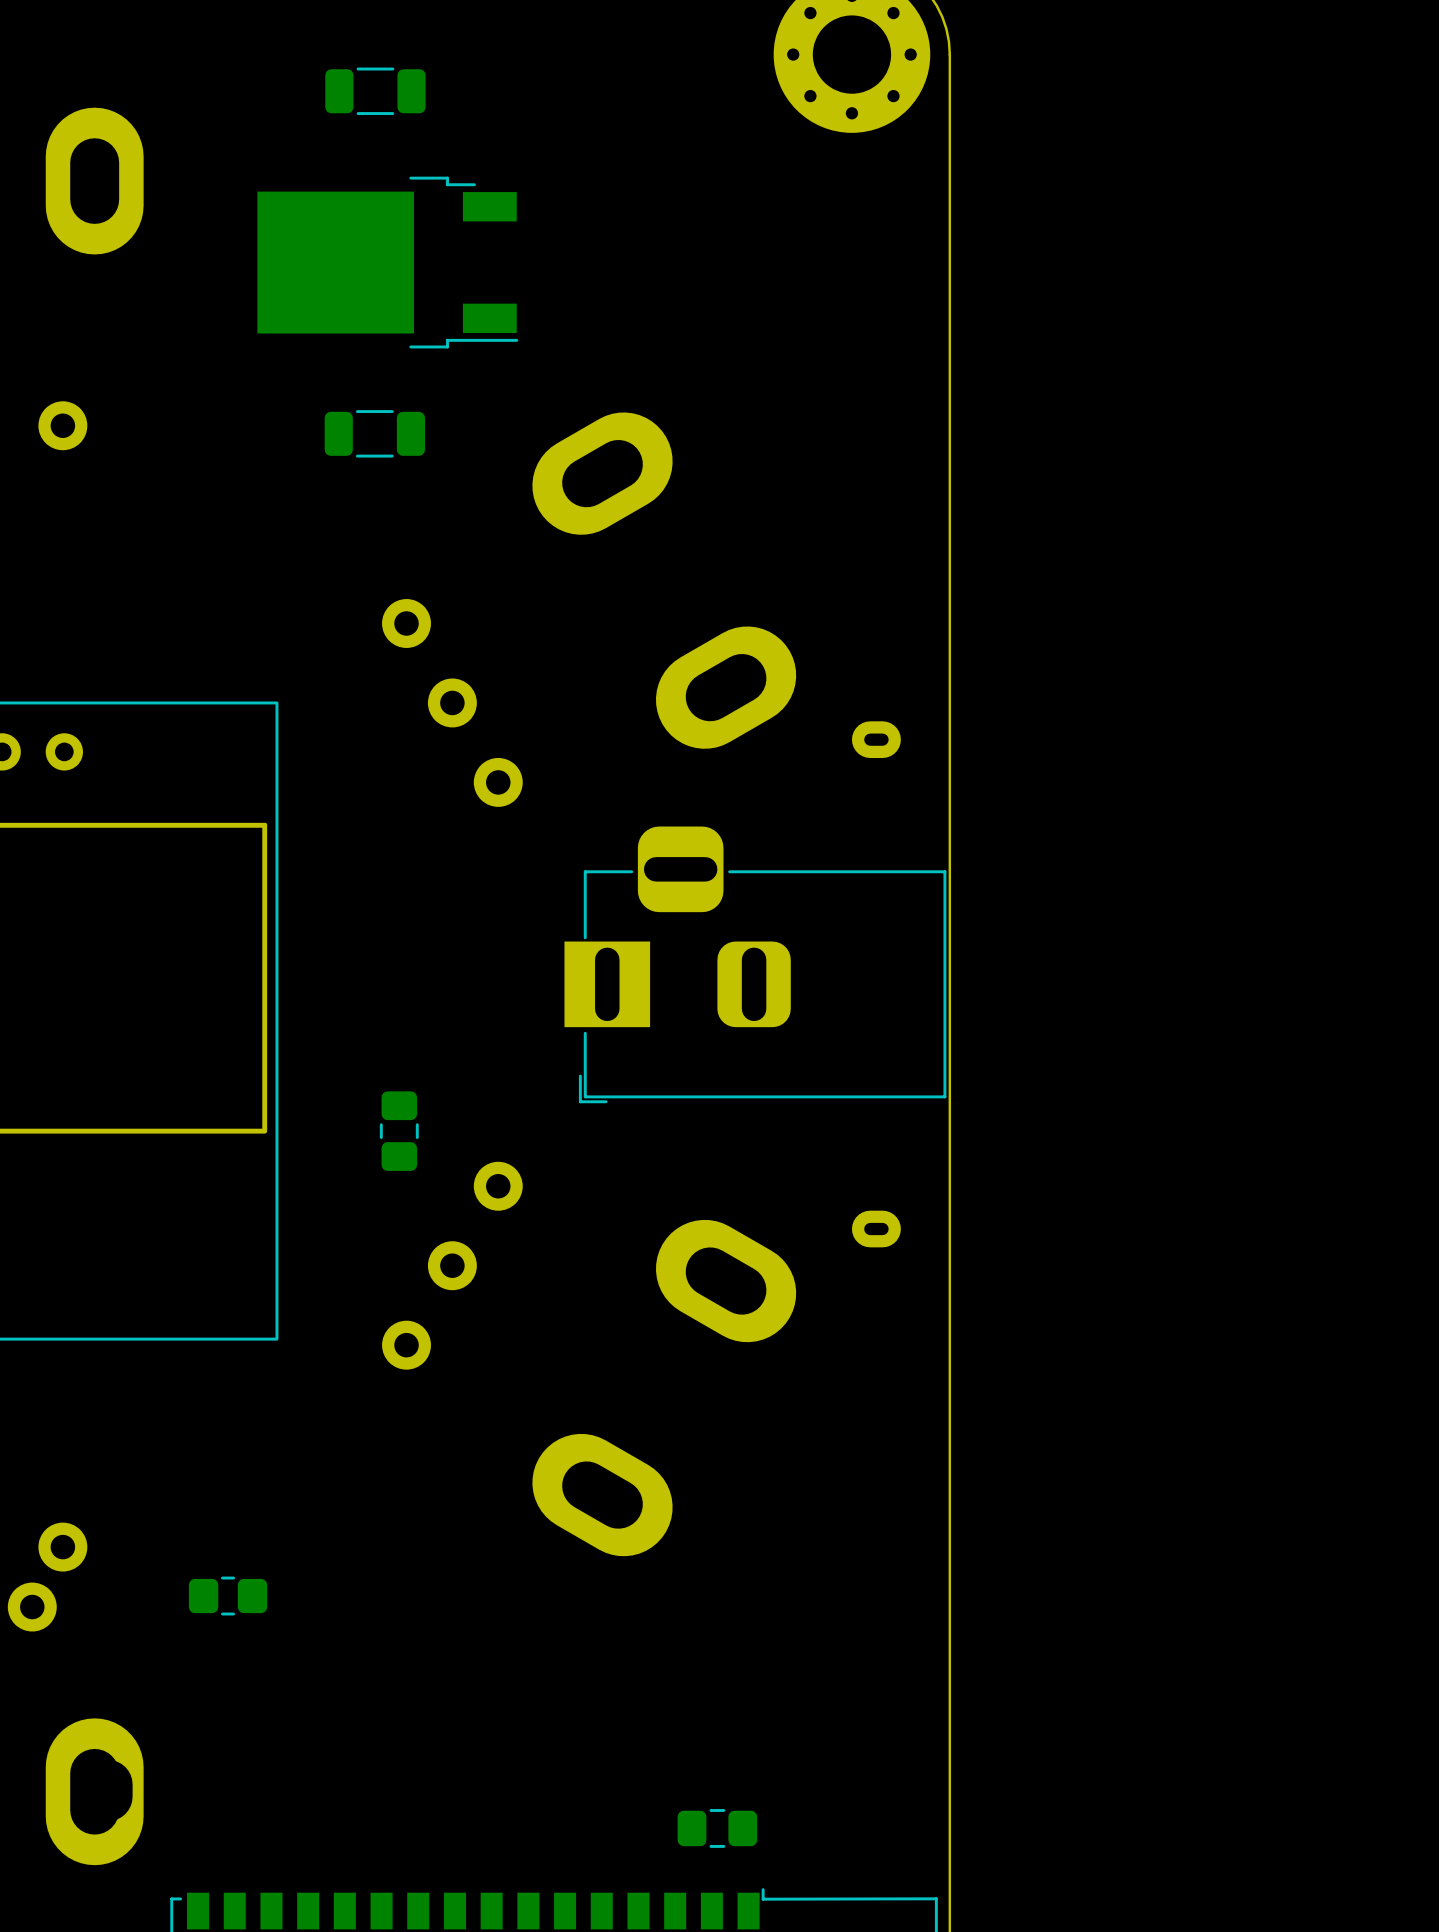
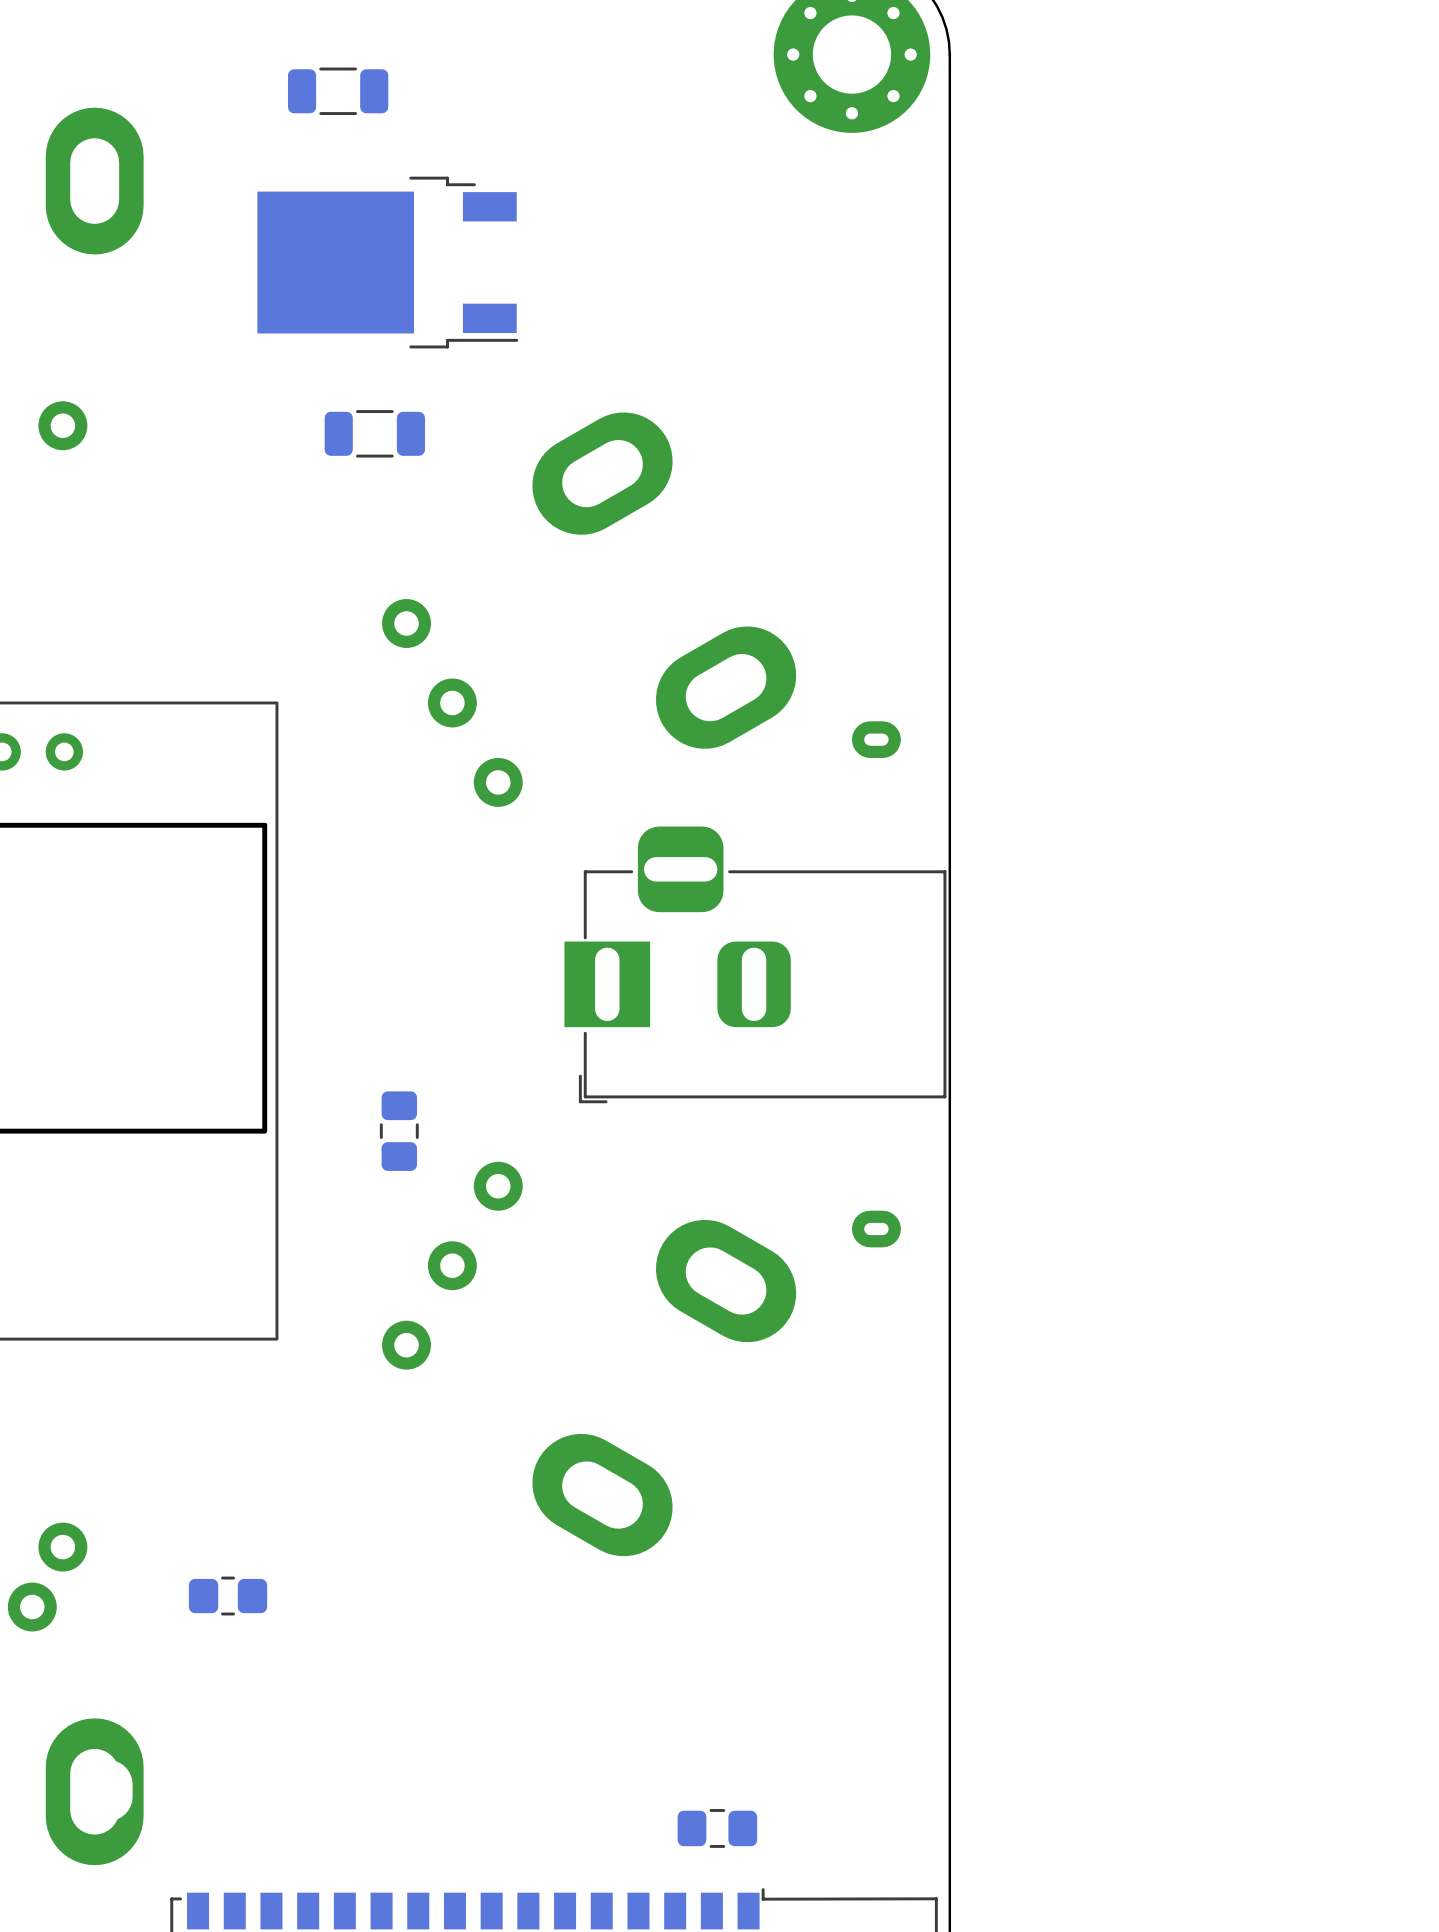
part position: (375, 91) -> (338, 91)

